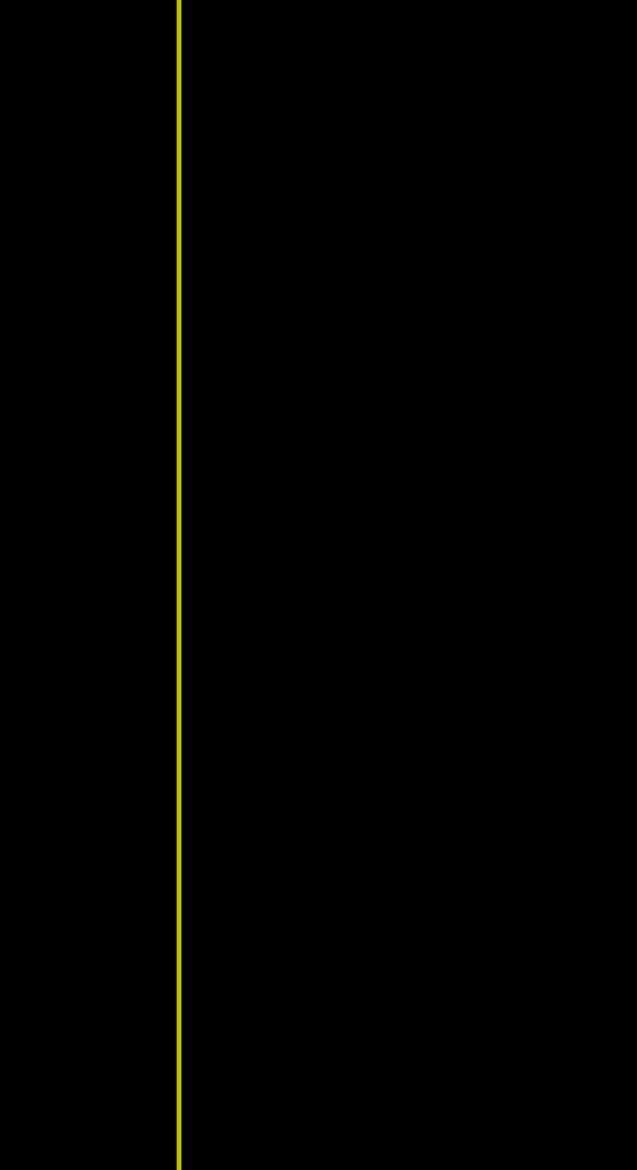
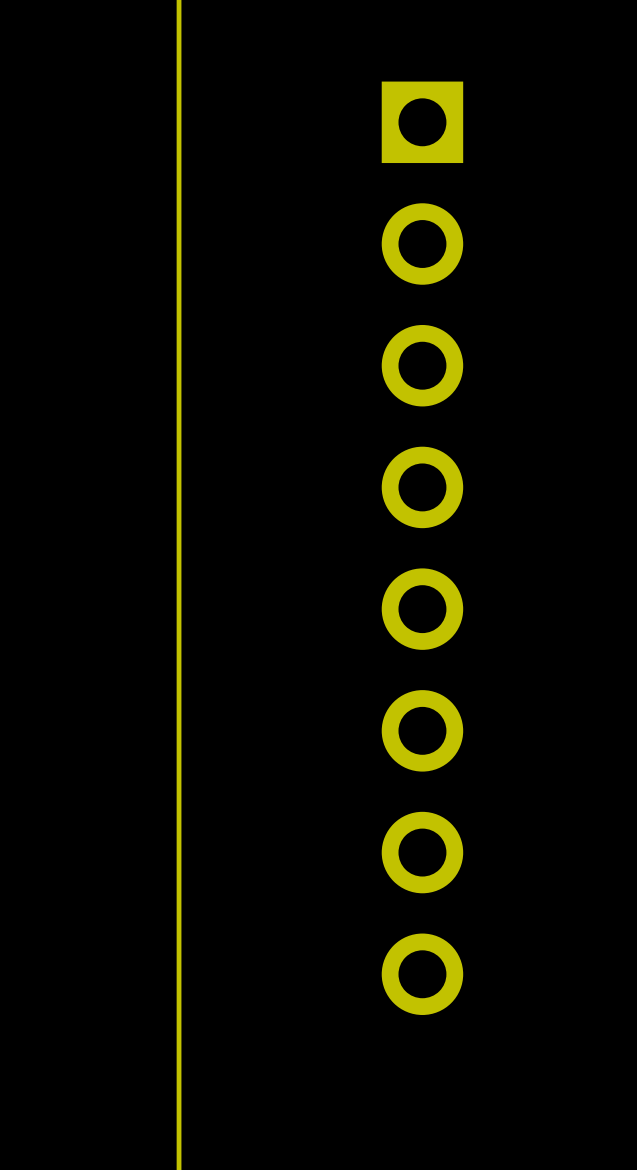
part: none -> (422, 548)

